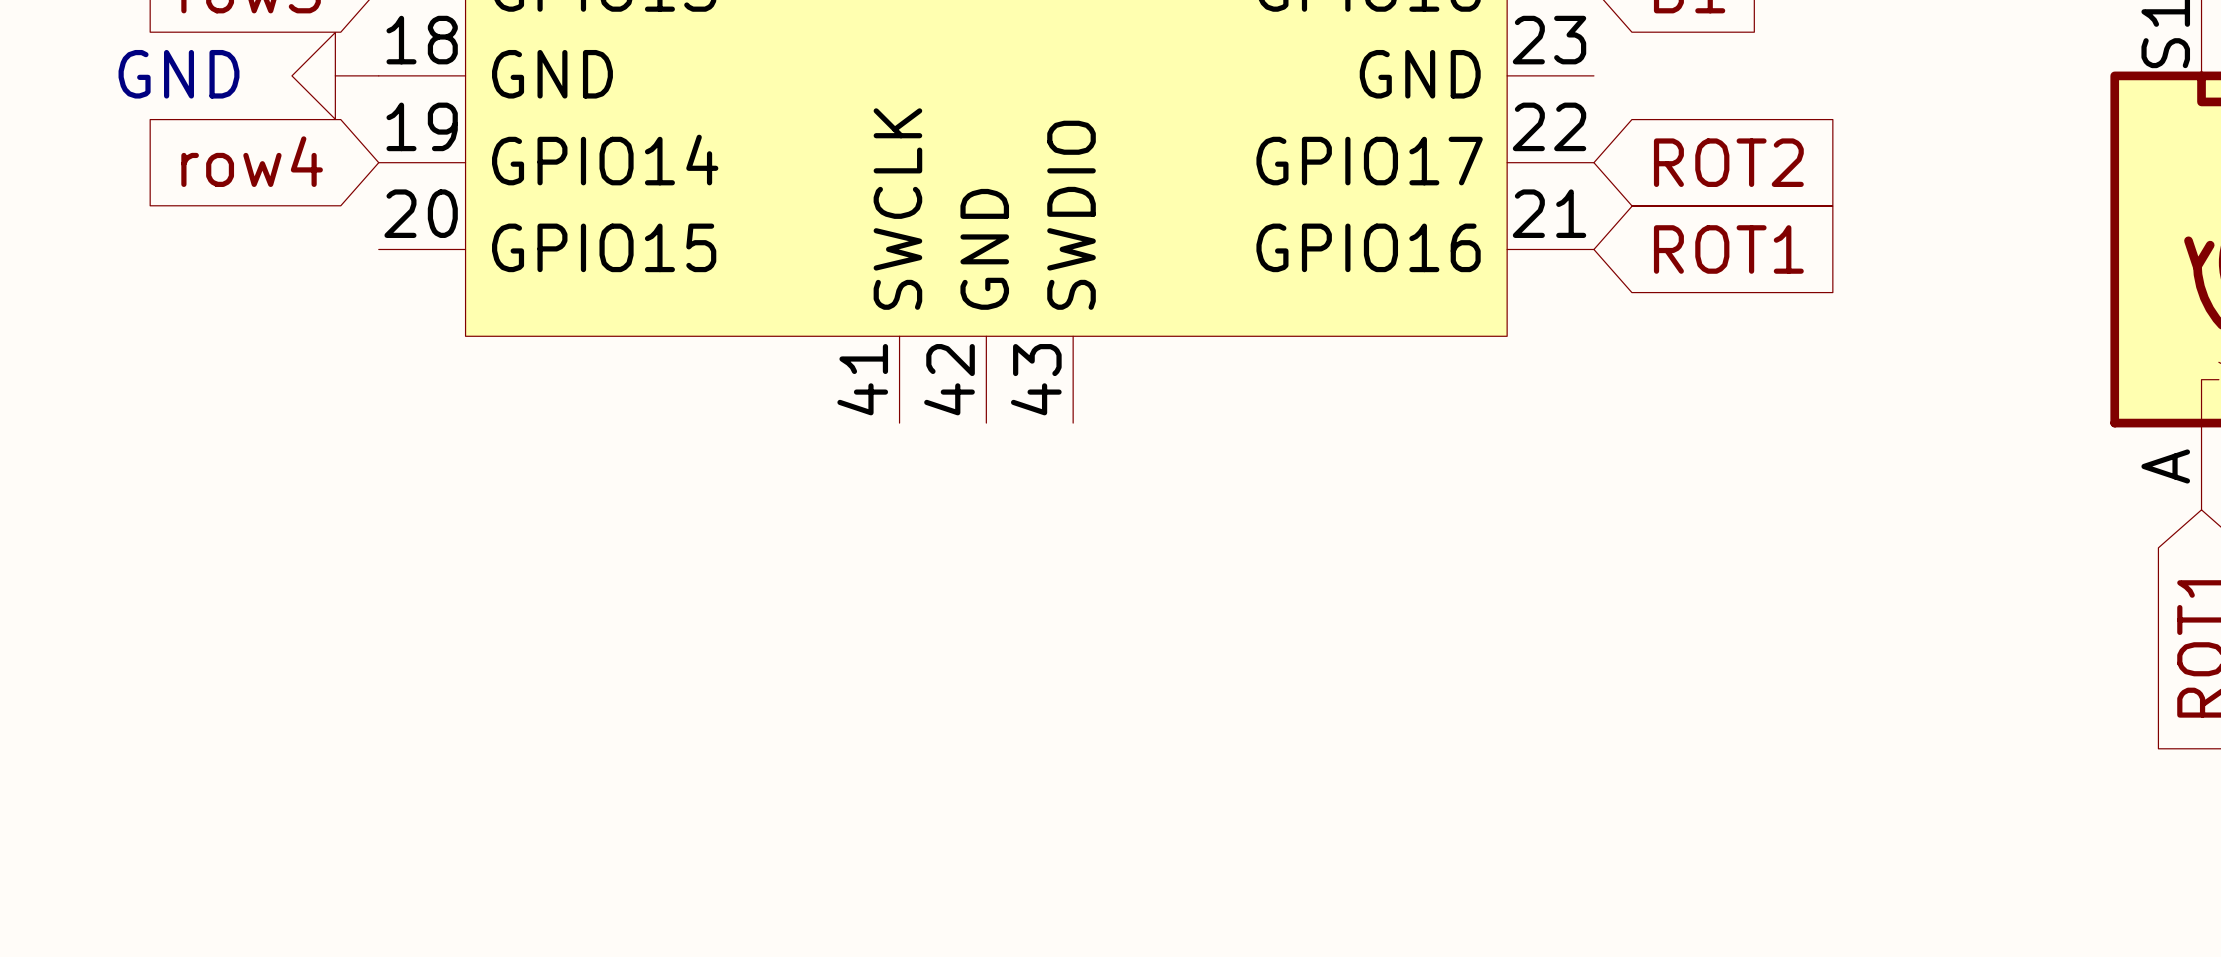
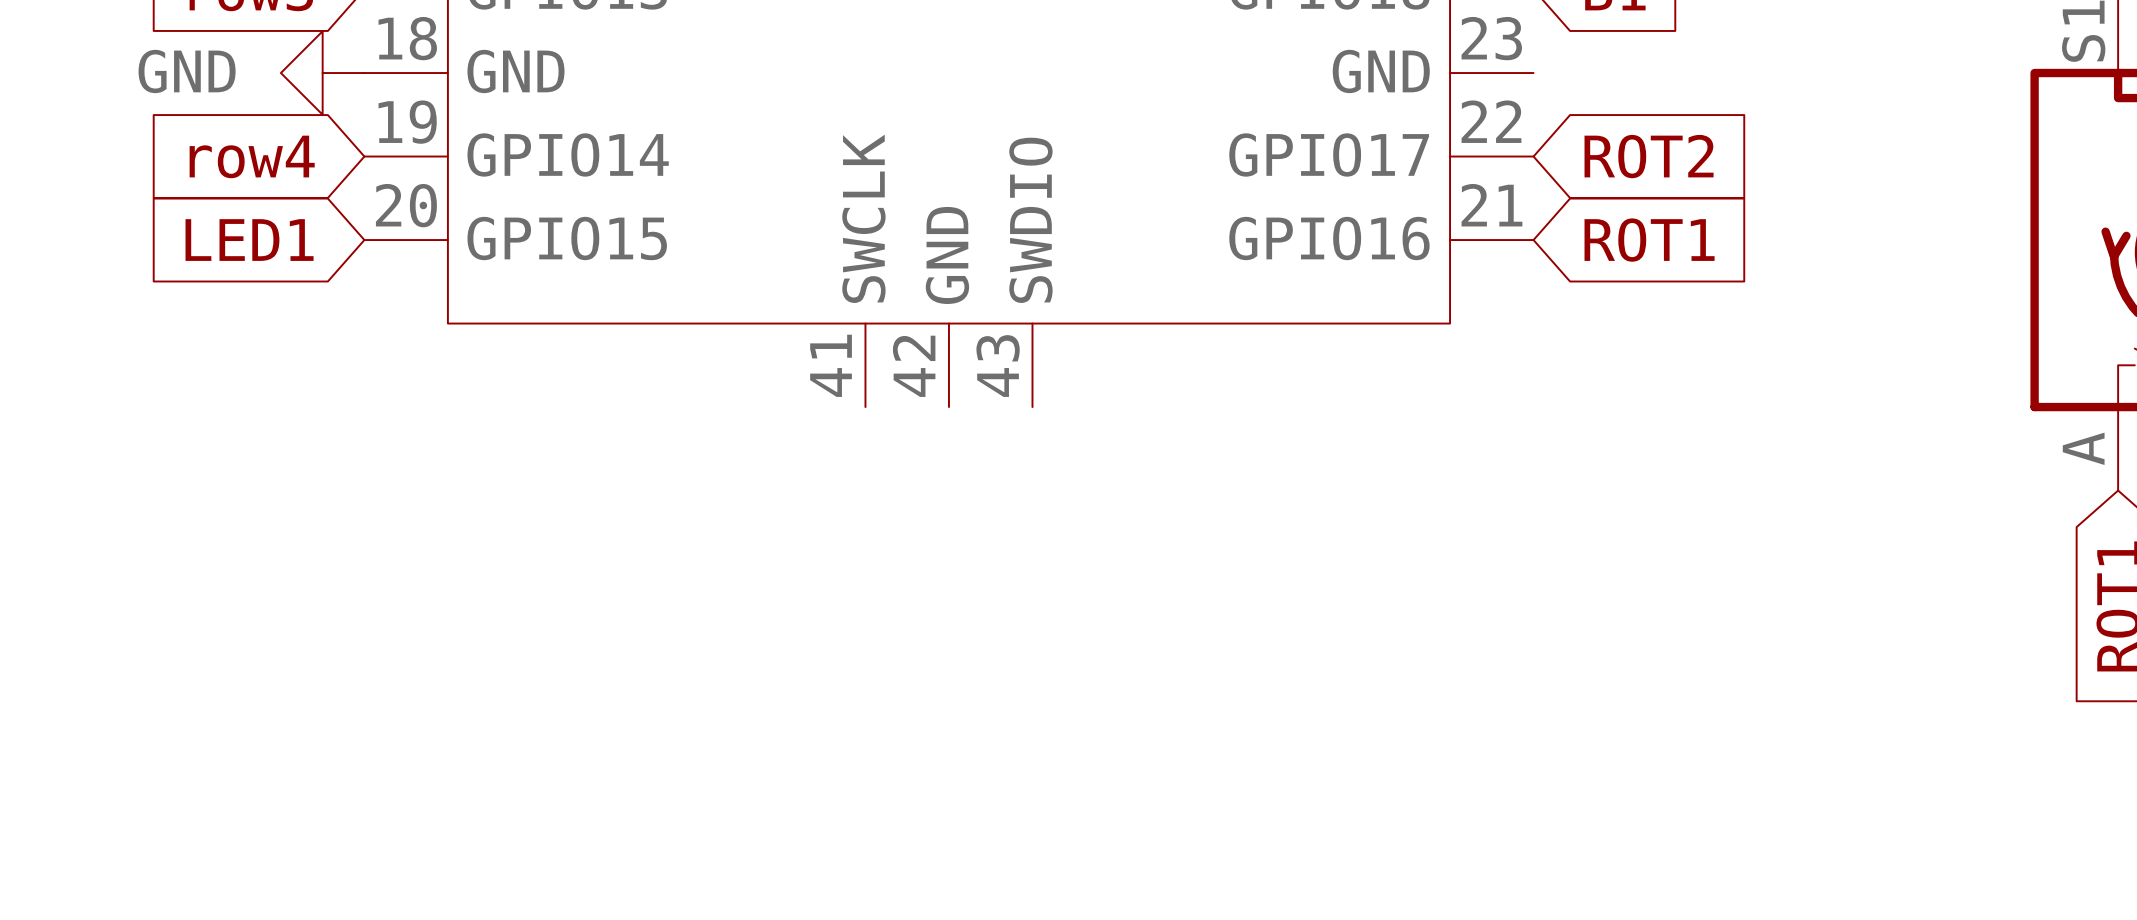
global label: none -> LED1 (249, 240)

